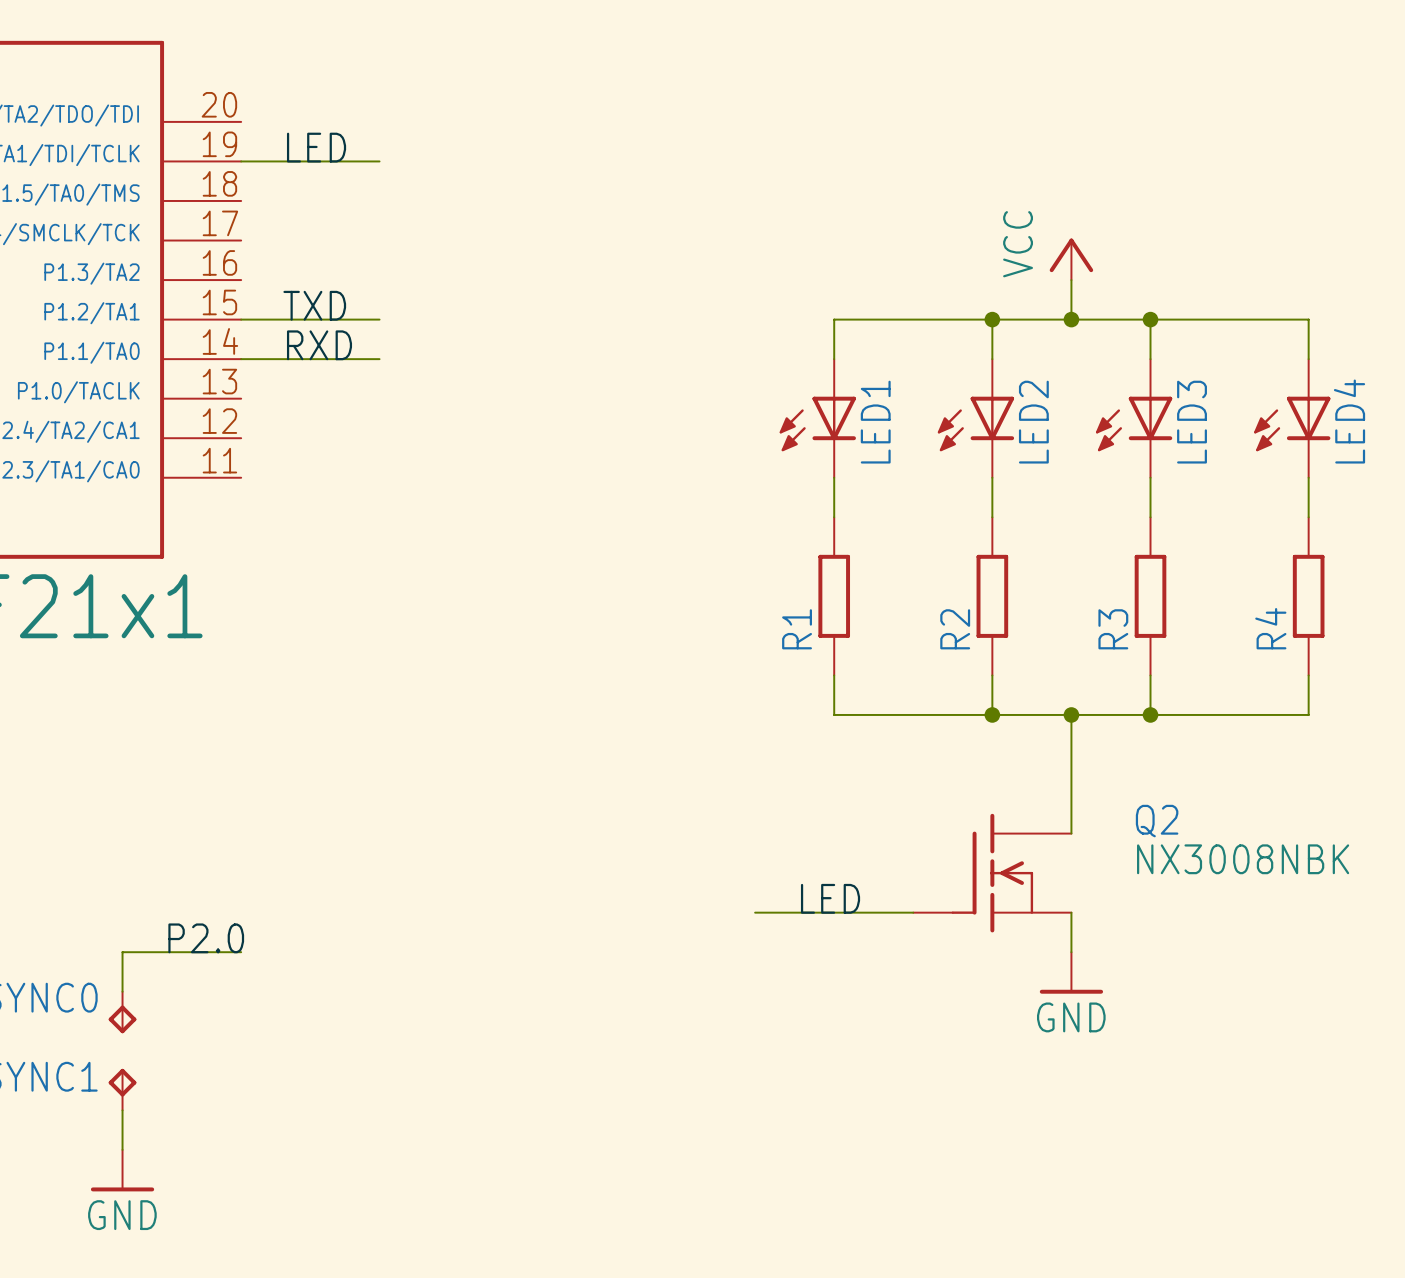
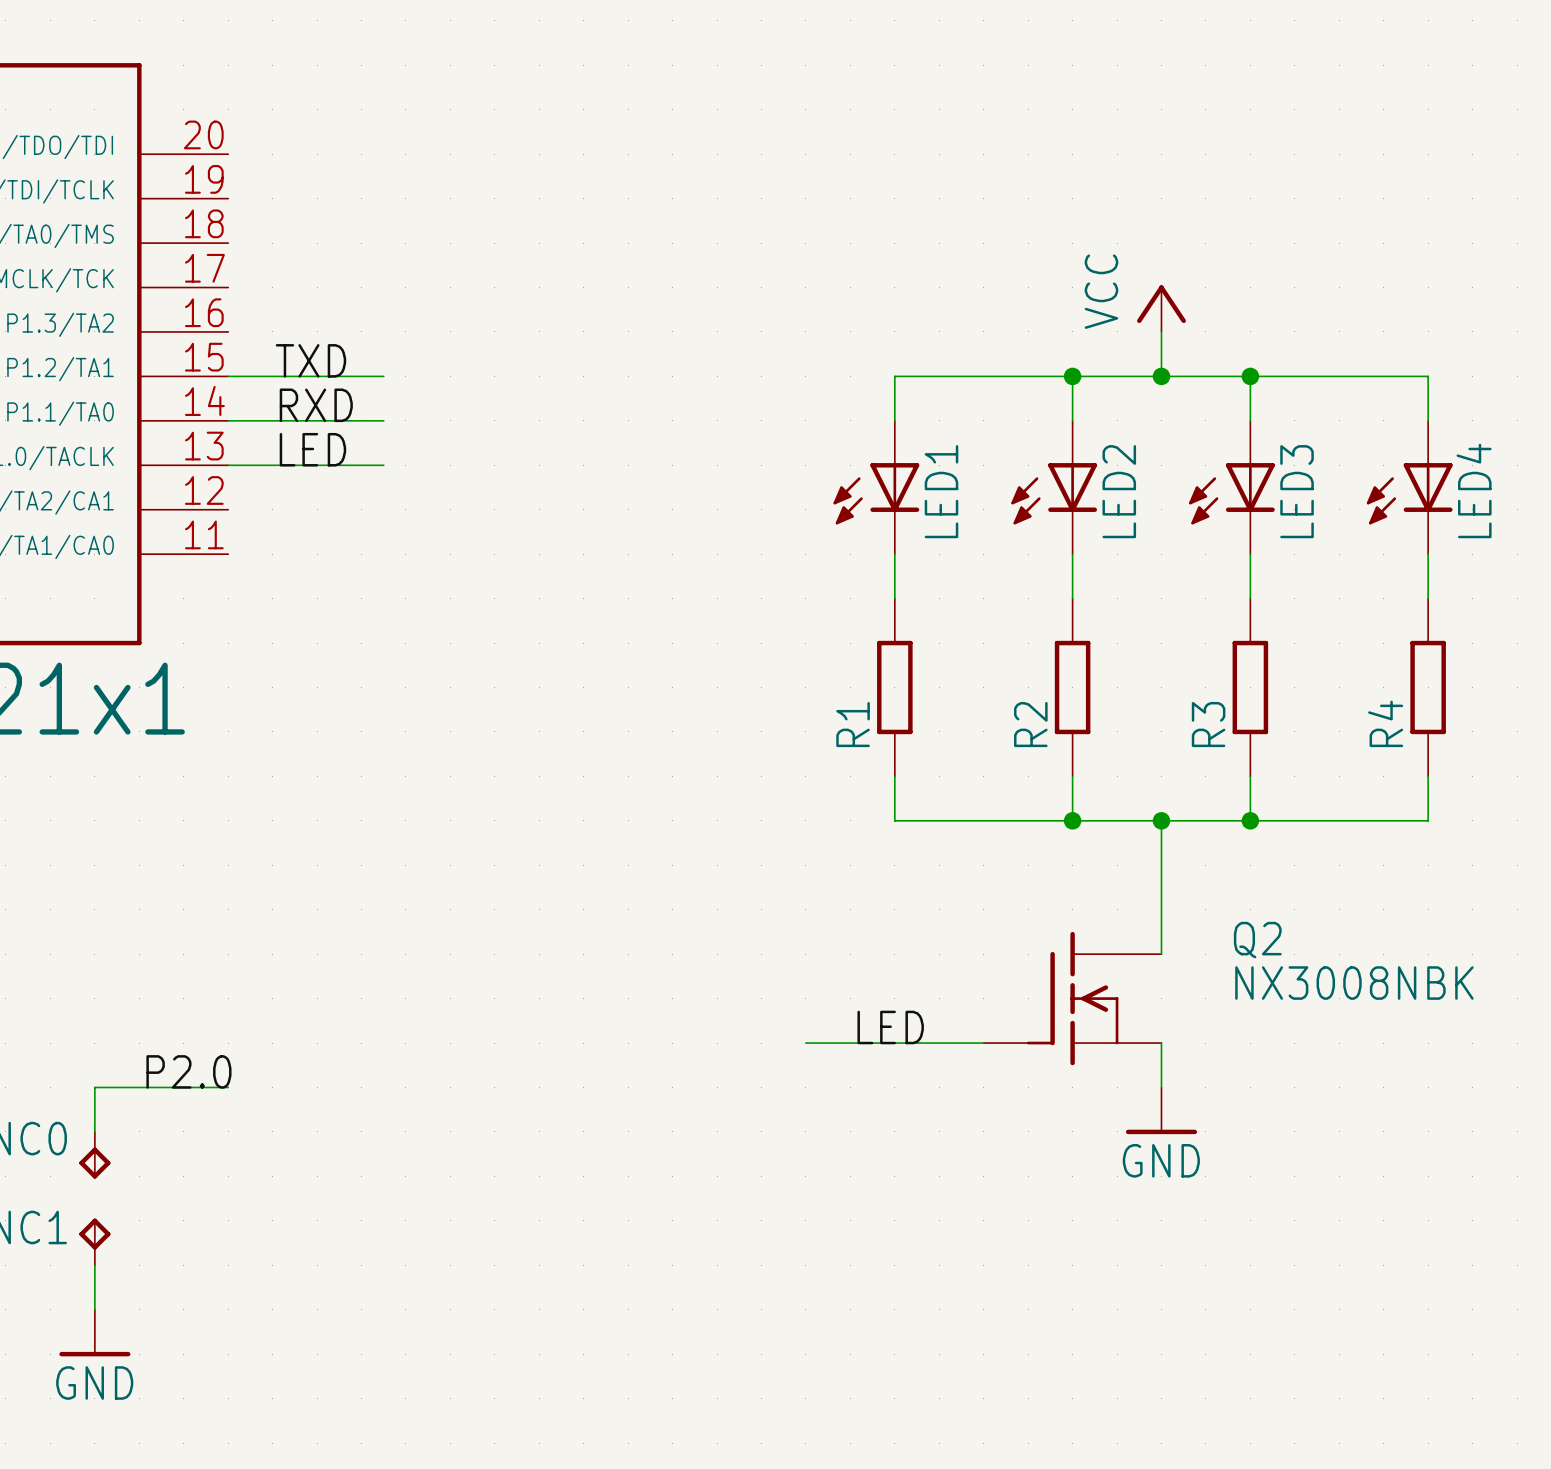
label position: LED (316, 147) -> LED (312, 449)
wire: (241, 161) (379, 161) -> (228, 465) (383, 465)

